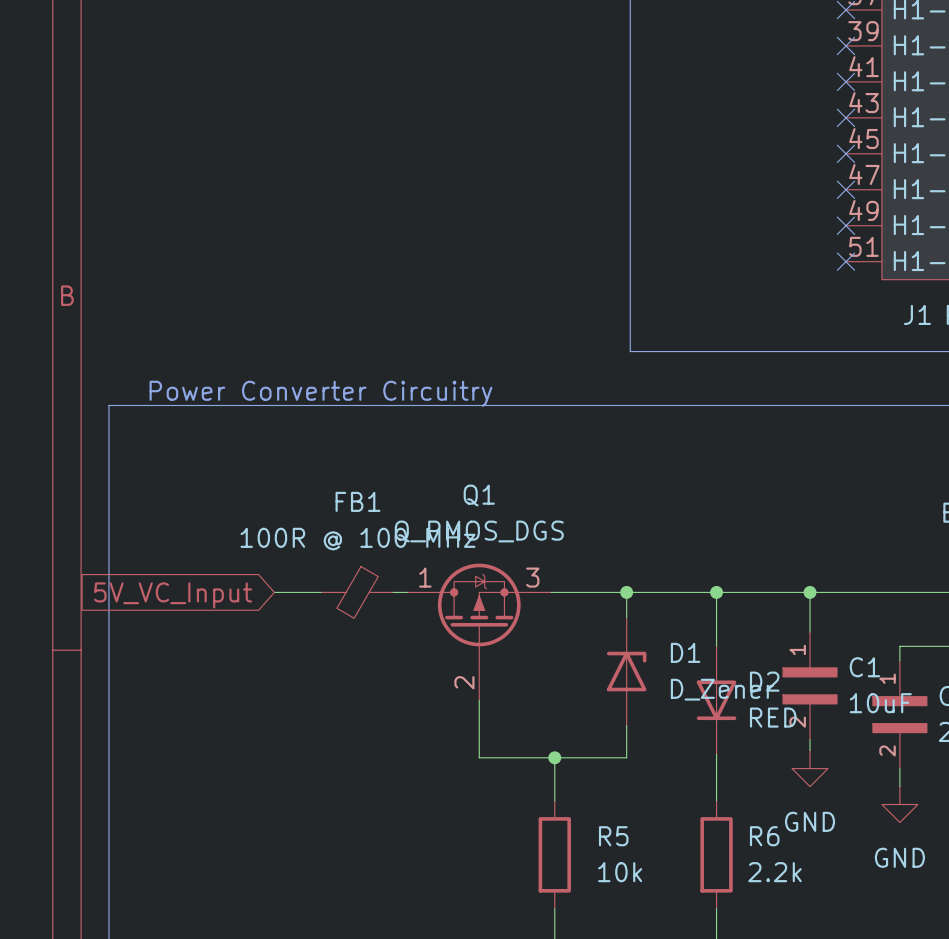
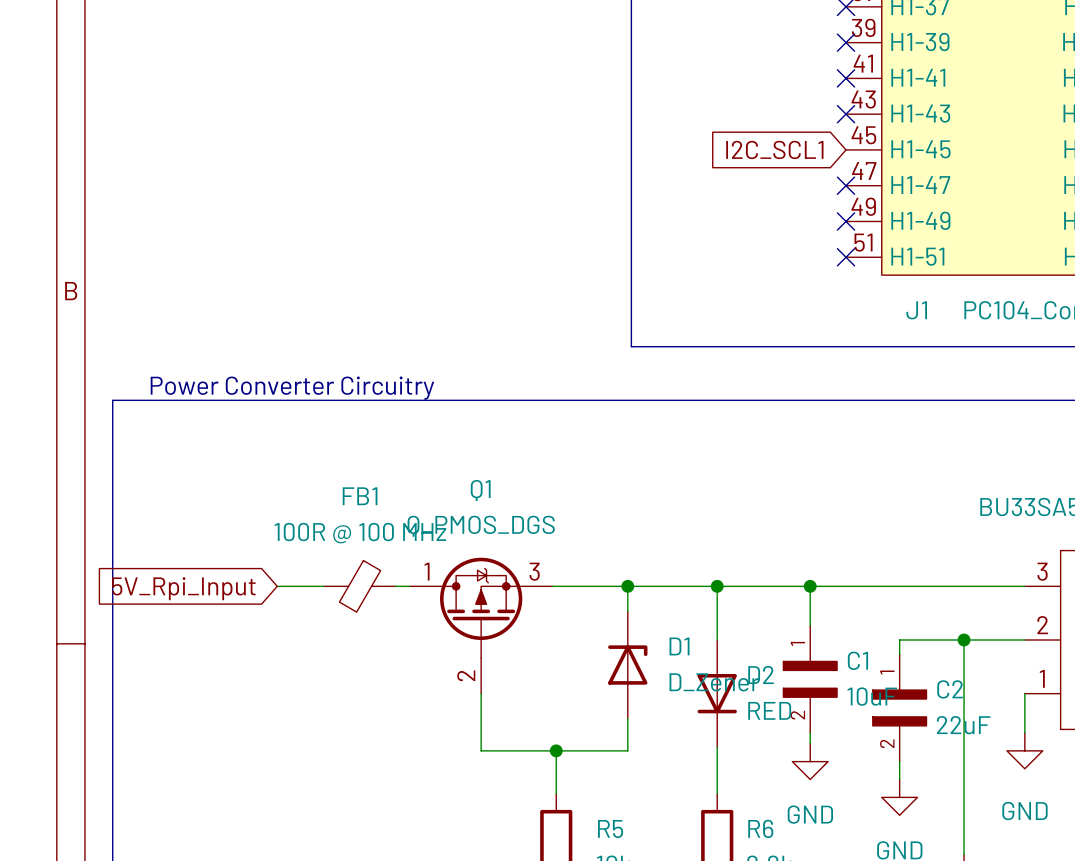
no-connect mark: (845, 153) -> none
global label: none -> I2C_SCL1 (774, 149)
global label: 5V_VC_Input (173, 595) -> 5V_Rpi_Input (183, 588)

